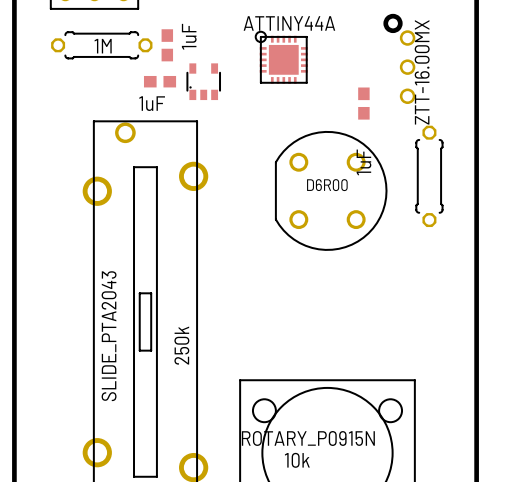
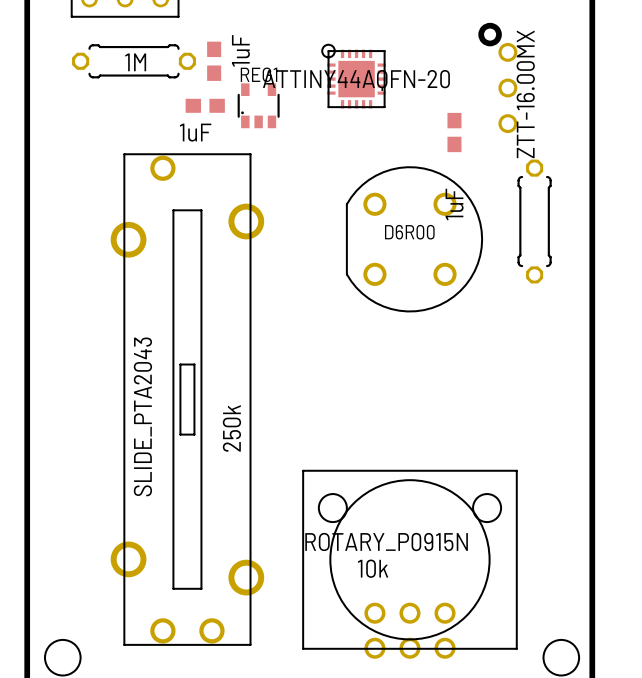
part value: ATTINY44A (289, 23) -> ATTINY44AQFN-20 (356, 80)
REG1 name: none -> REG1 (259, 74)

